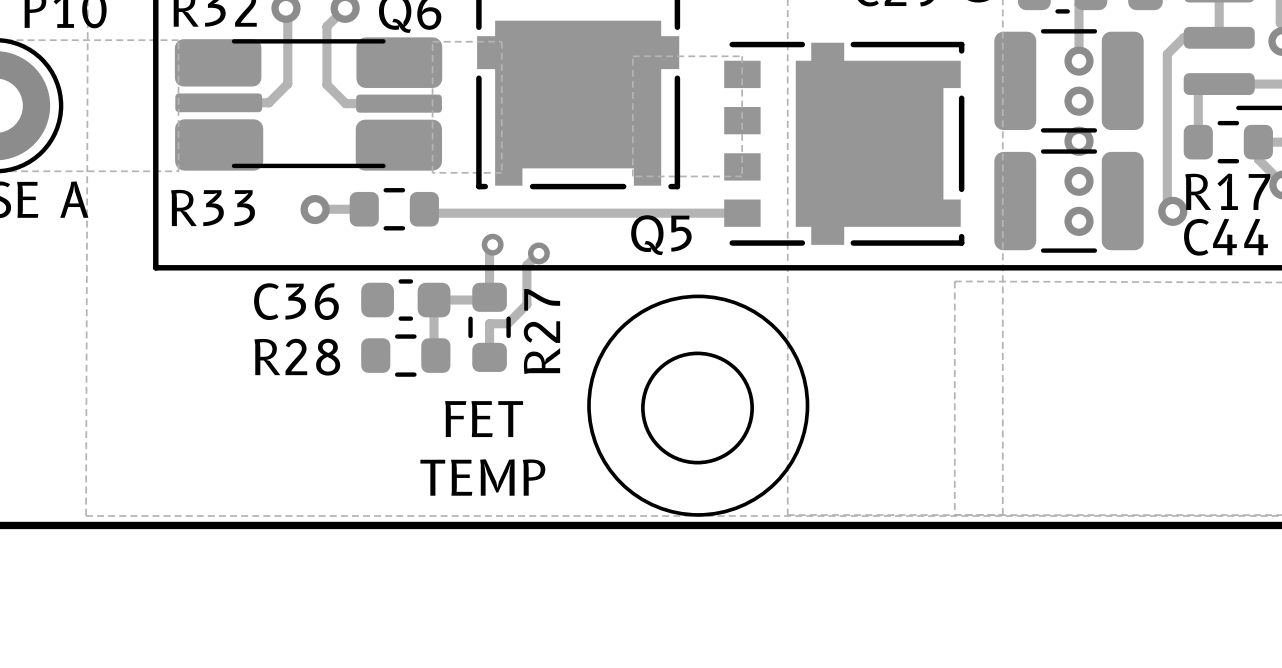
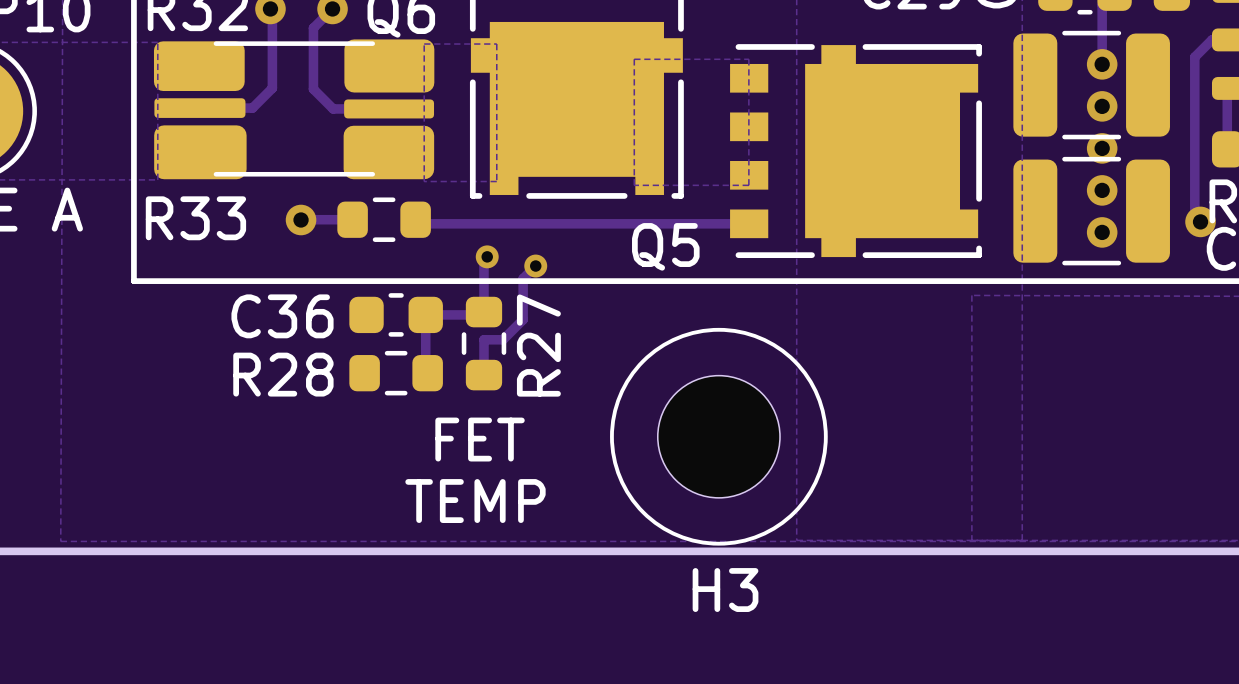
drawing: [587, 294, 810, 517] -> none
round board edge: [641, 351, 754, 465] -> none
H3: none -> (718, 436)

